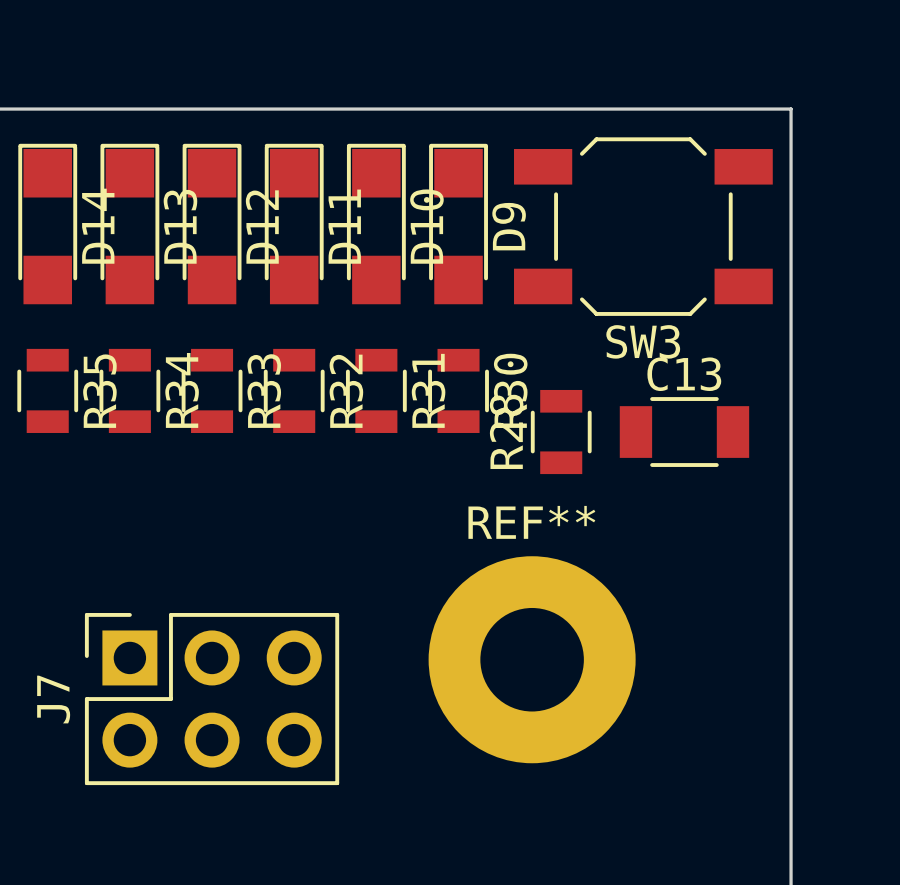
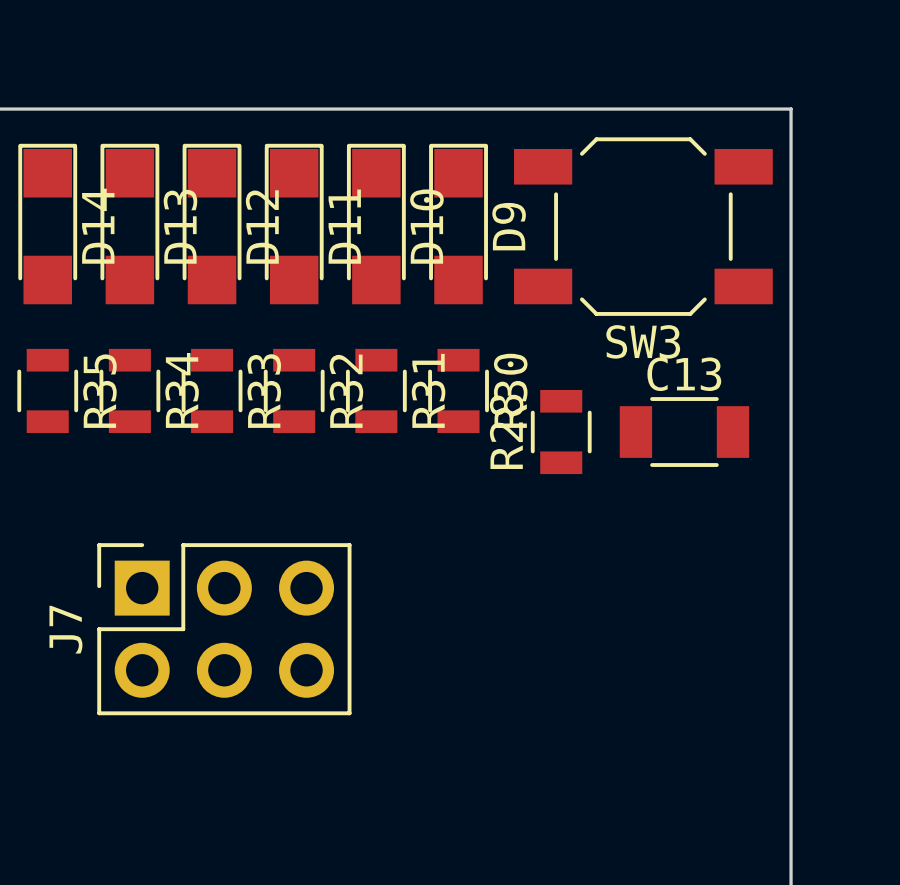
REF**: (532, 659) -> none
J7 position: (212, 699) -> (224, 629)

